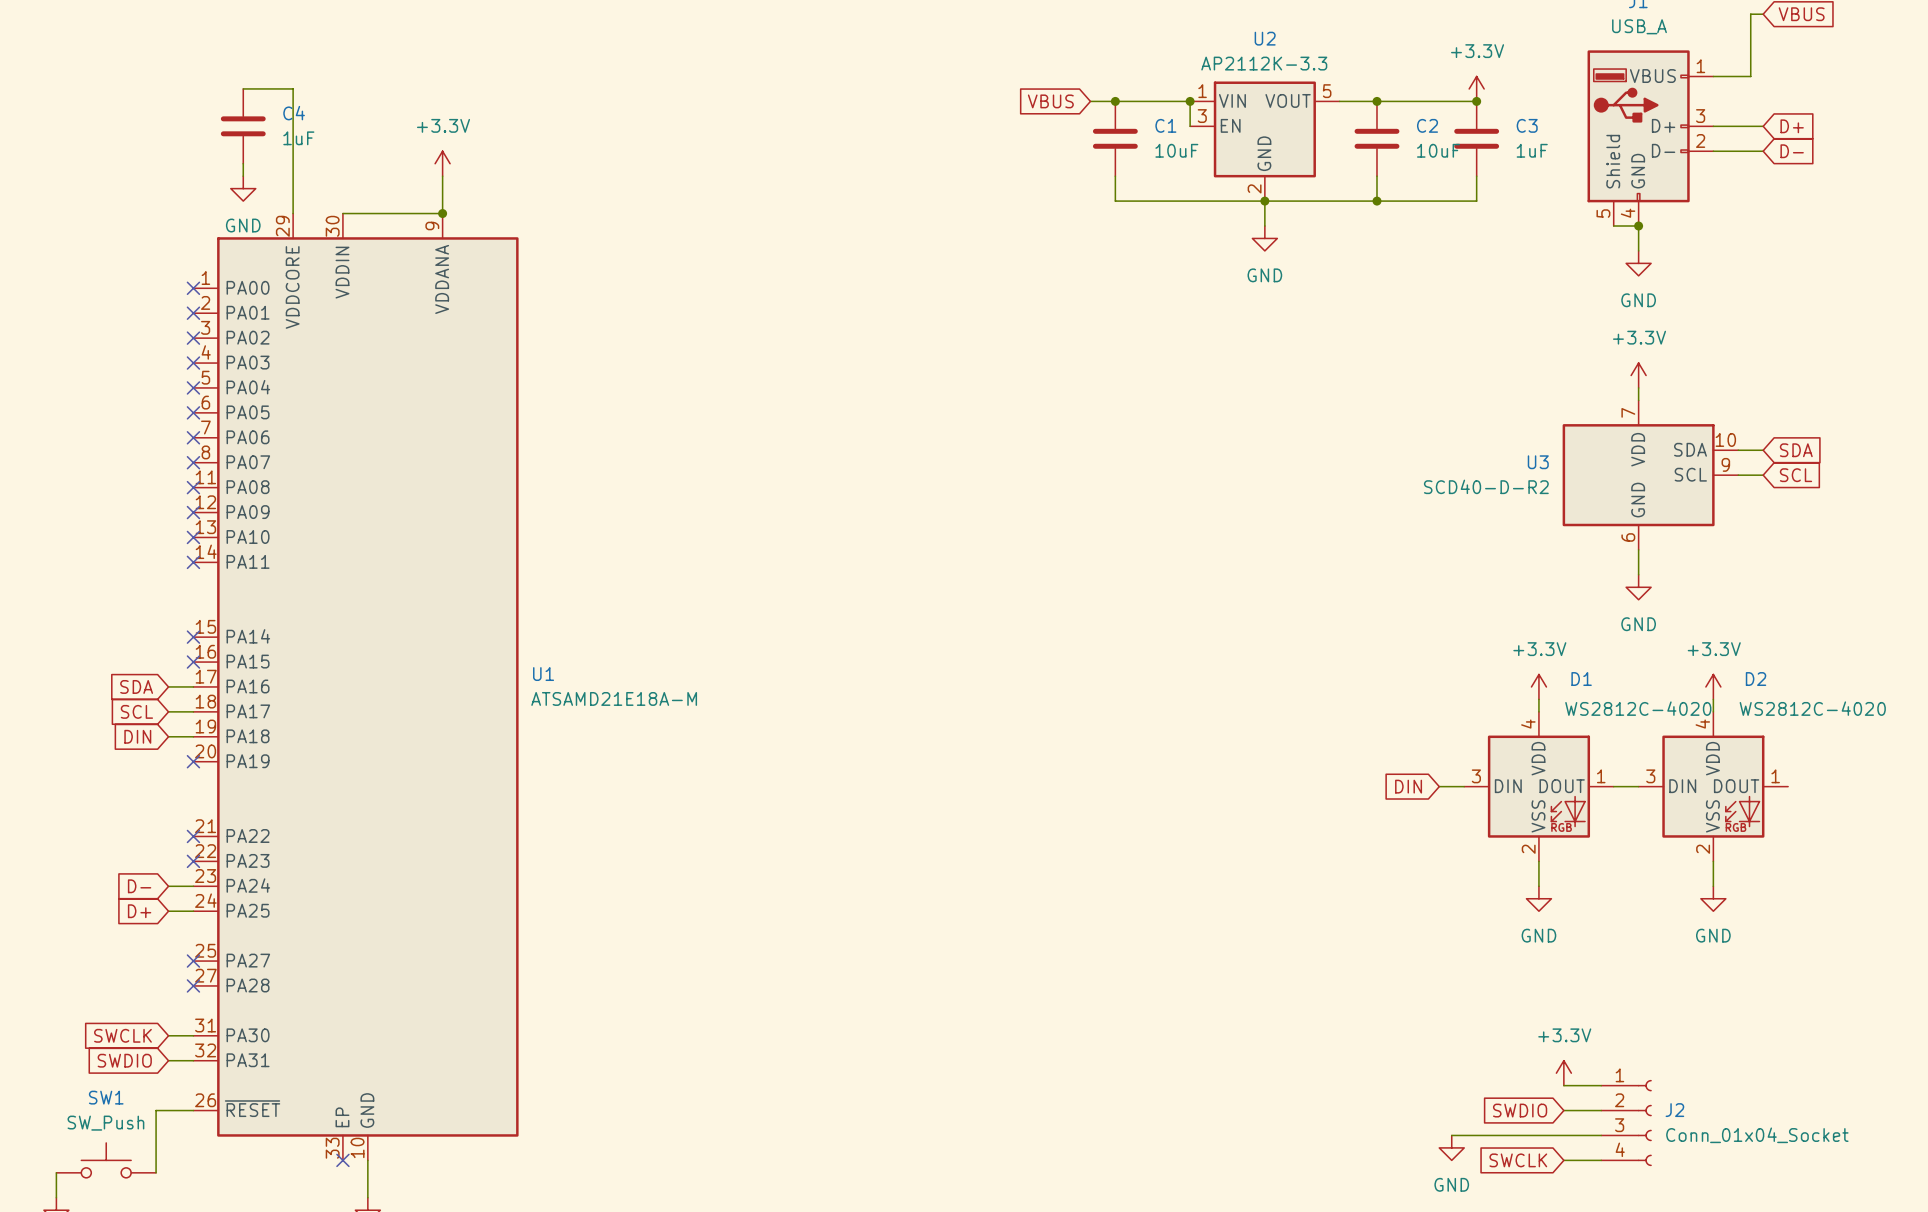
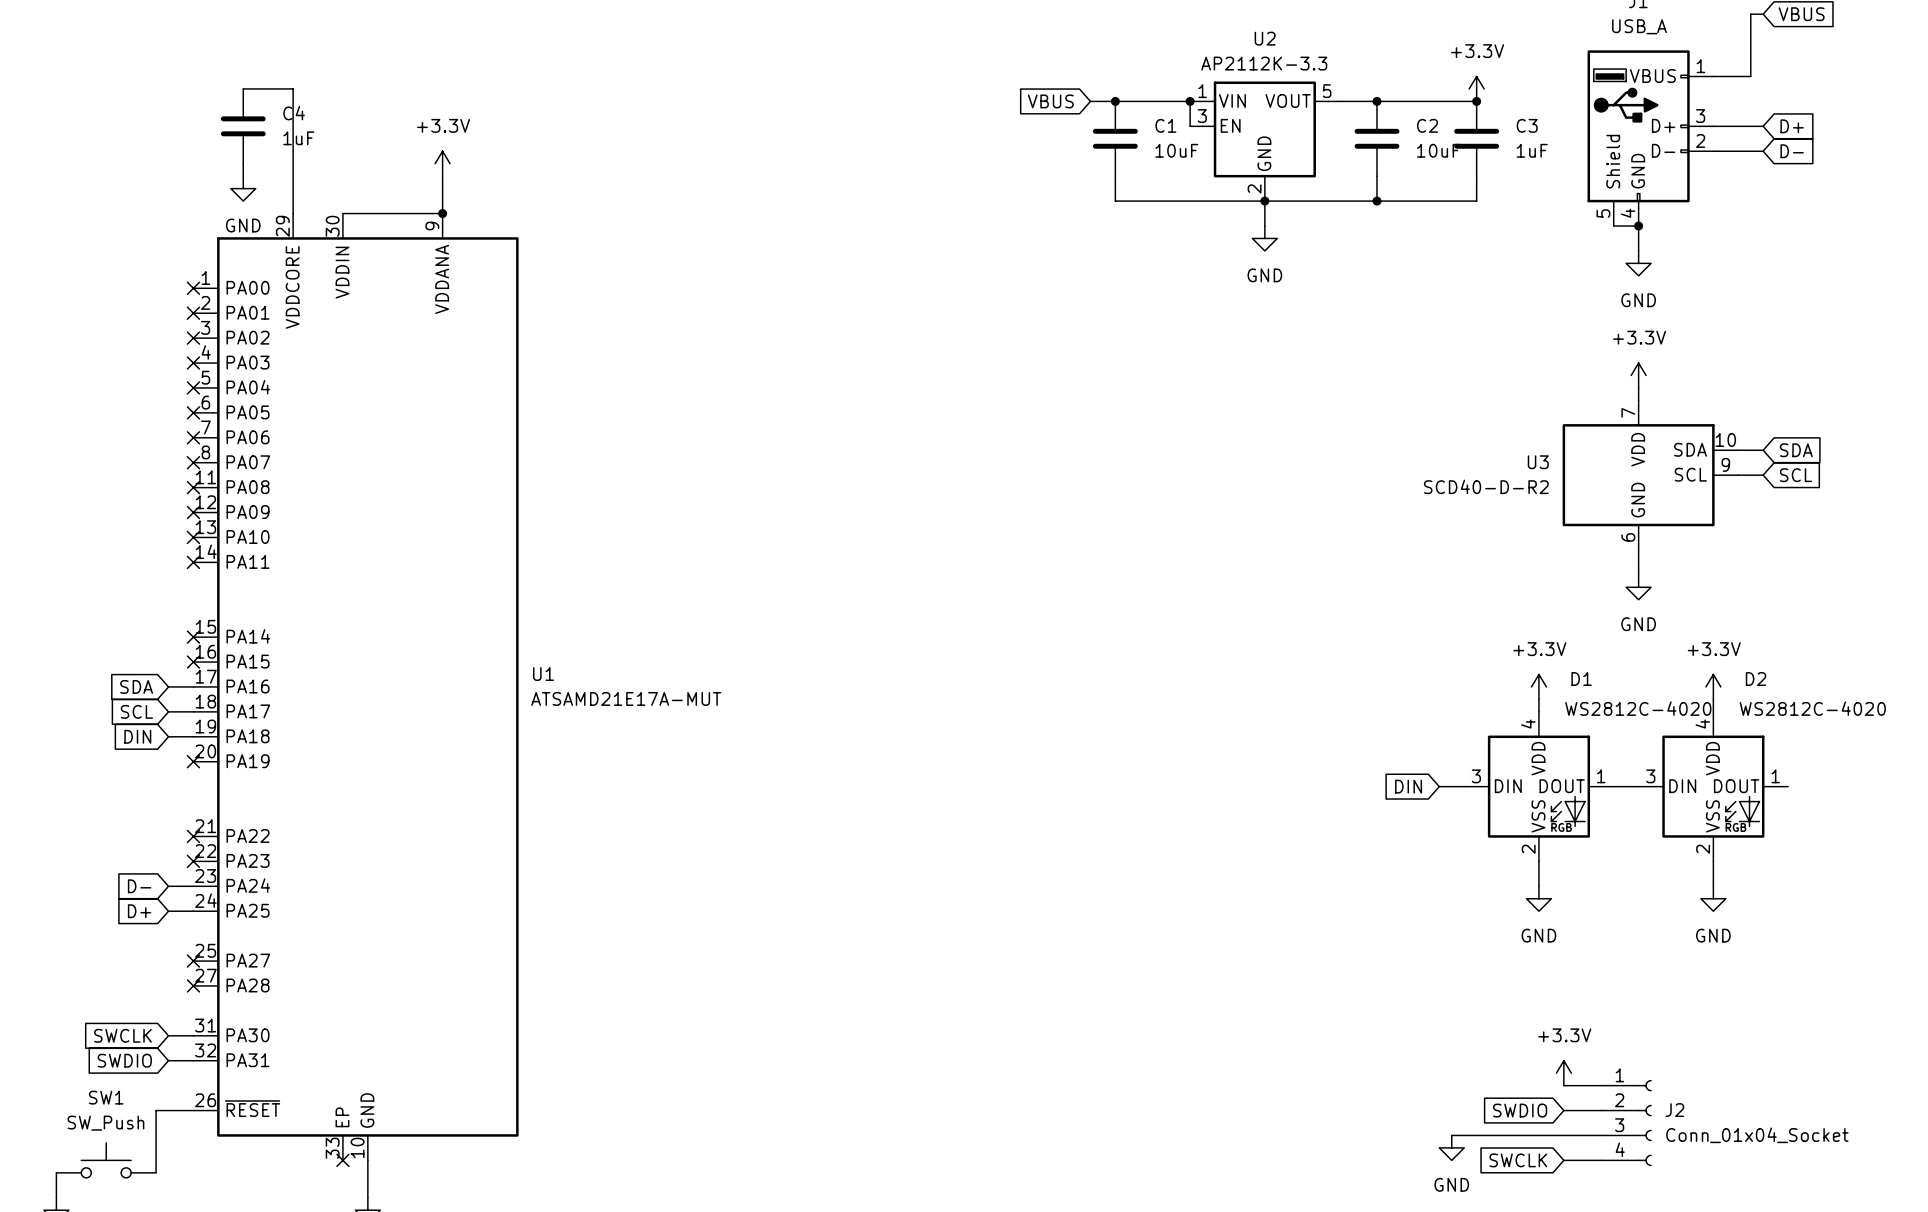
U1 value: ATSAMD21E18A-M (614, 698) -> ATSAMD21E17A-MUT (626, 698)

